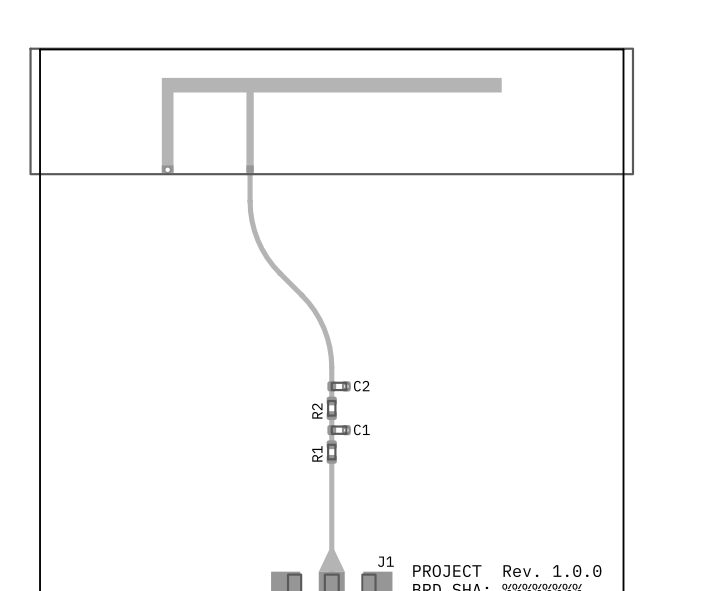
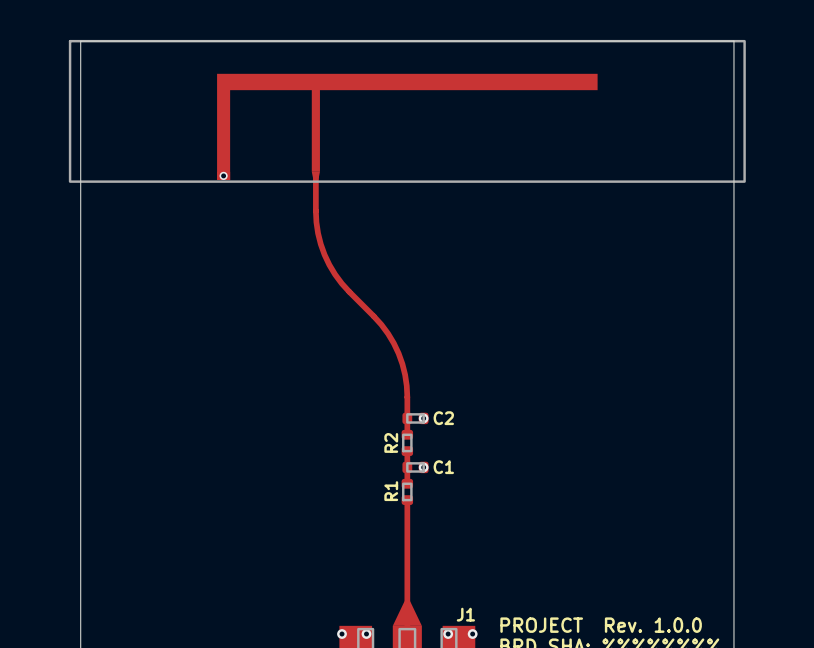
part footprint: [29, 47, 635, 176] -> [68, 39, 746, 183]
via: none -> (342, 634)
via: none -> (366, 634)
via: none -> (448, 634)
via: none -> (472, 634)

